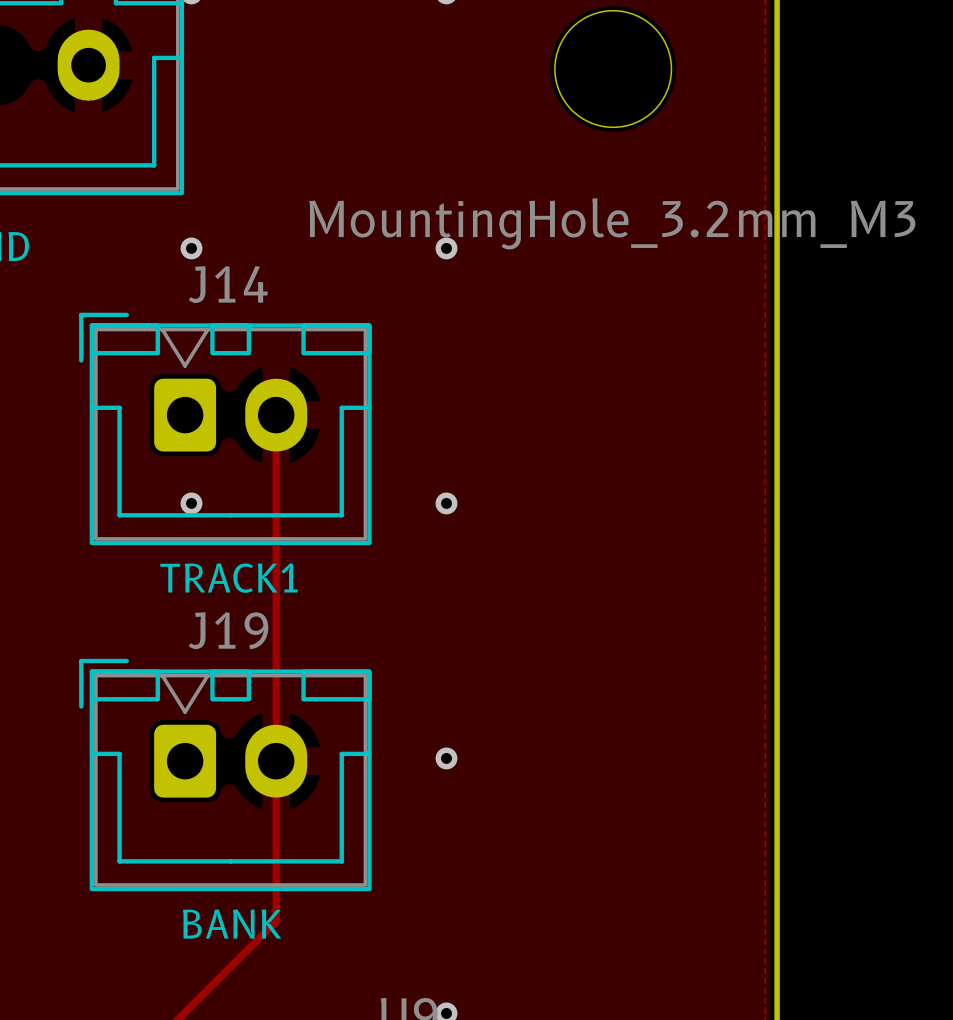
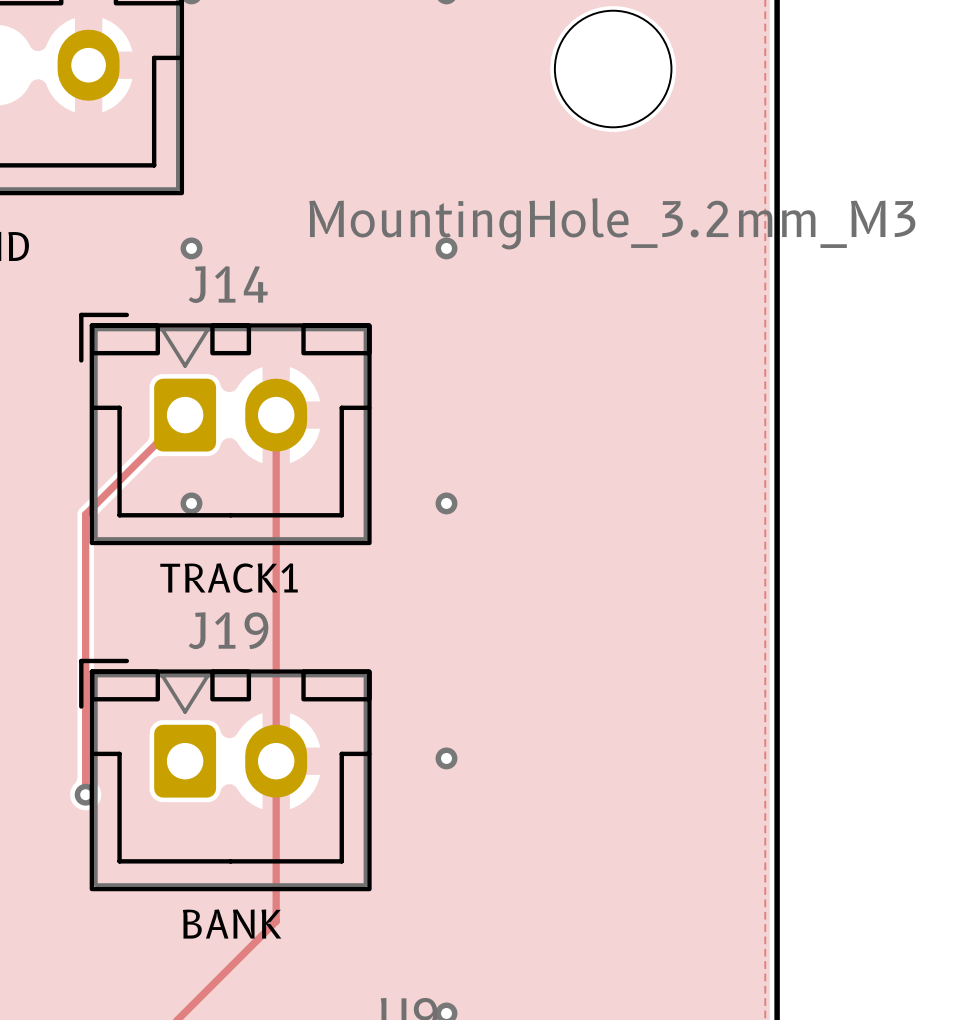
track: none -> (185, 415) (85, 514) (85, 794)
via: none -> (85, 794)

